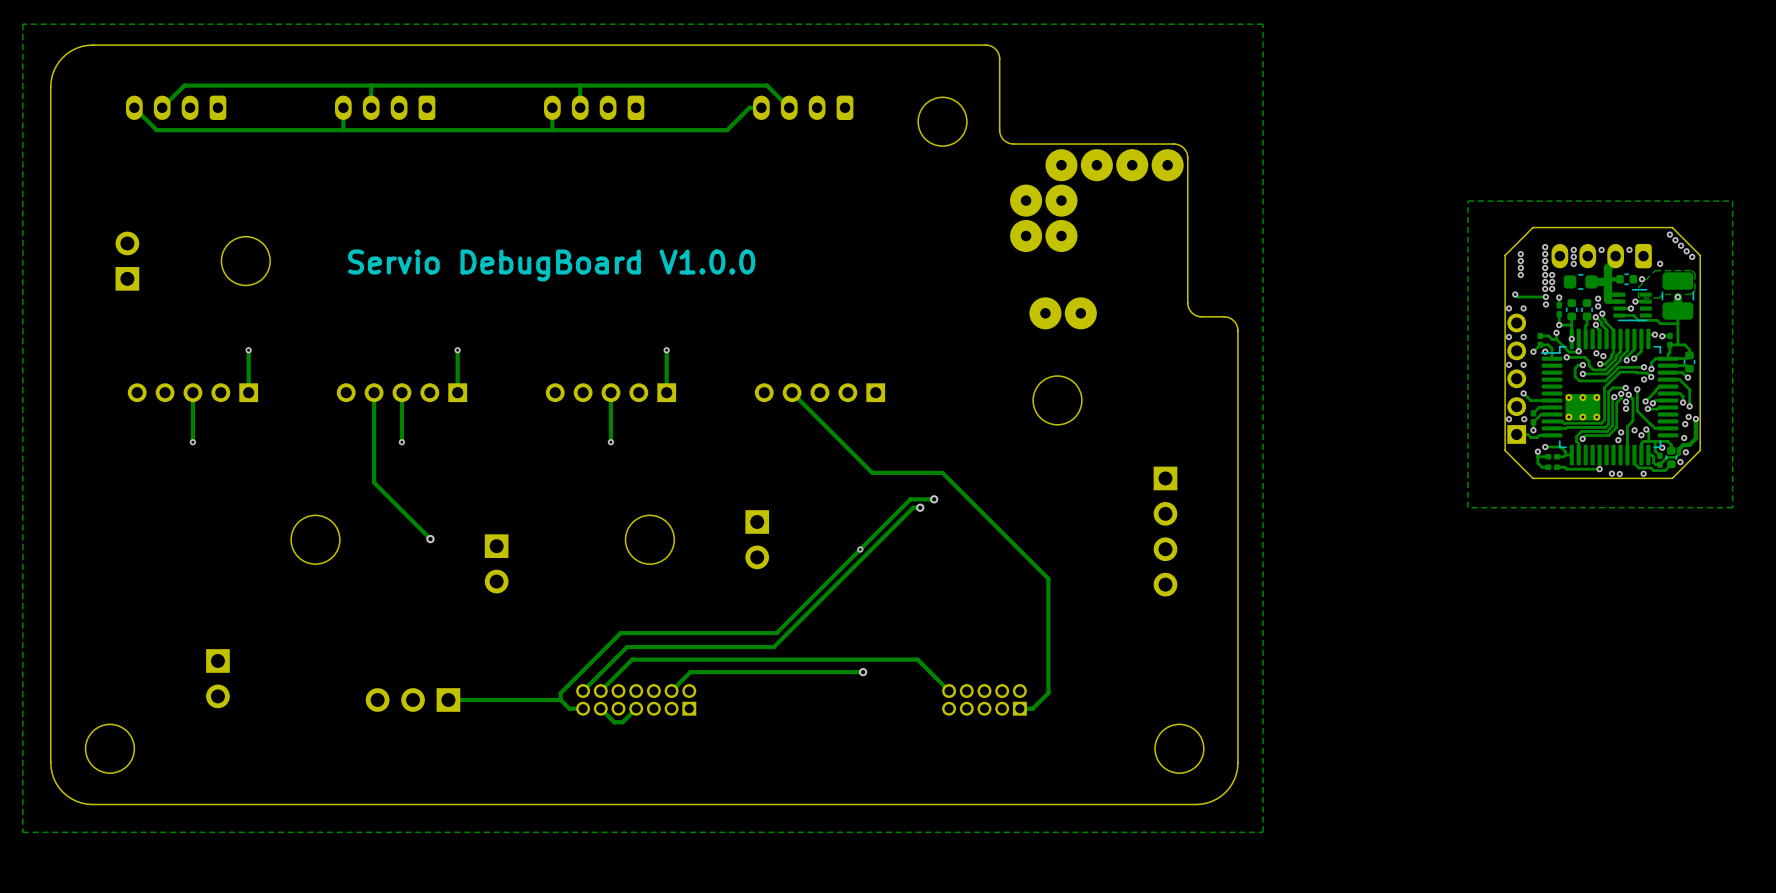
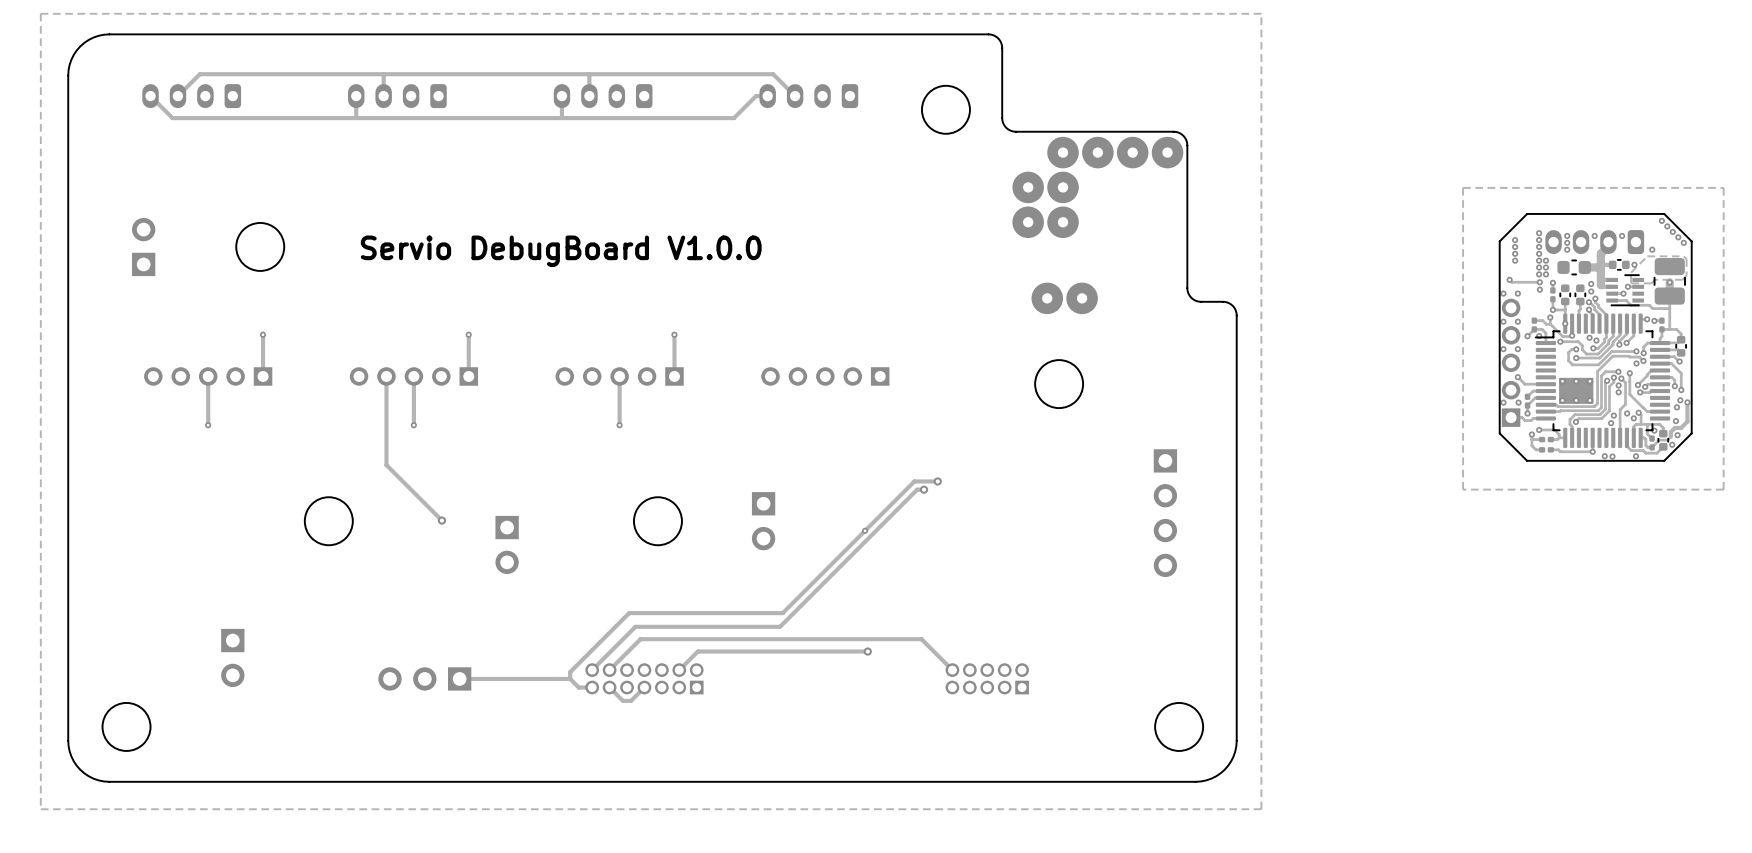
track: (792, 392) (872, 472) (942, 472) (1048, 578) (1048, 693) (1032, 708) (1019, 708) -> none

